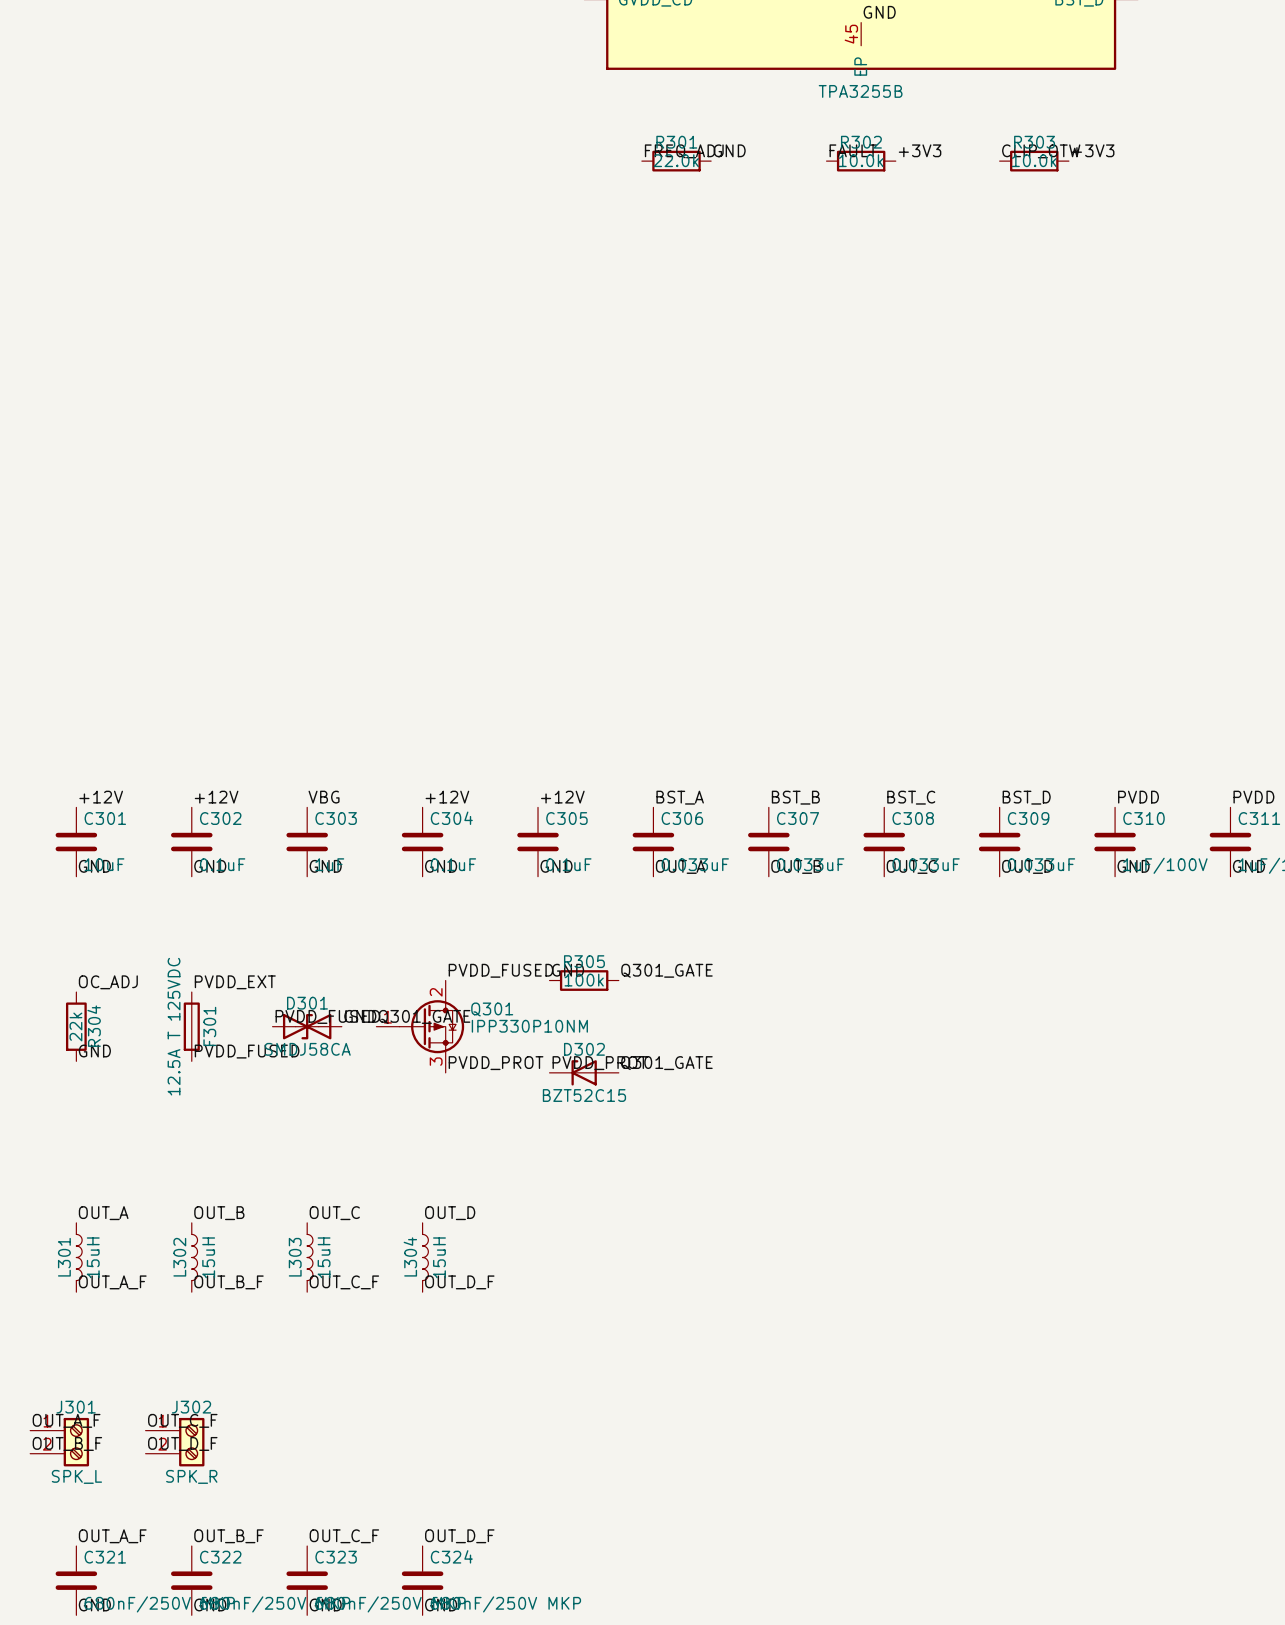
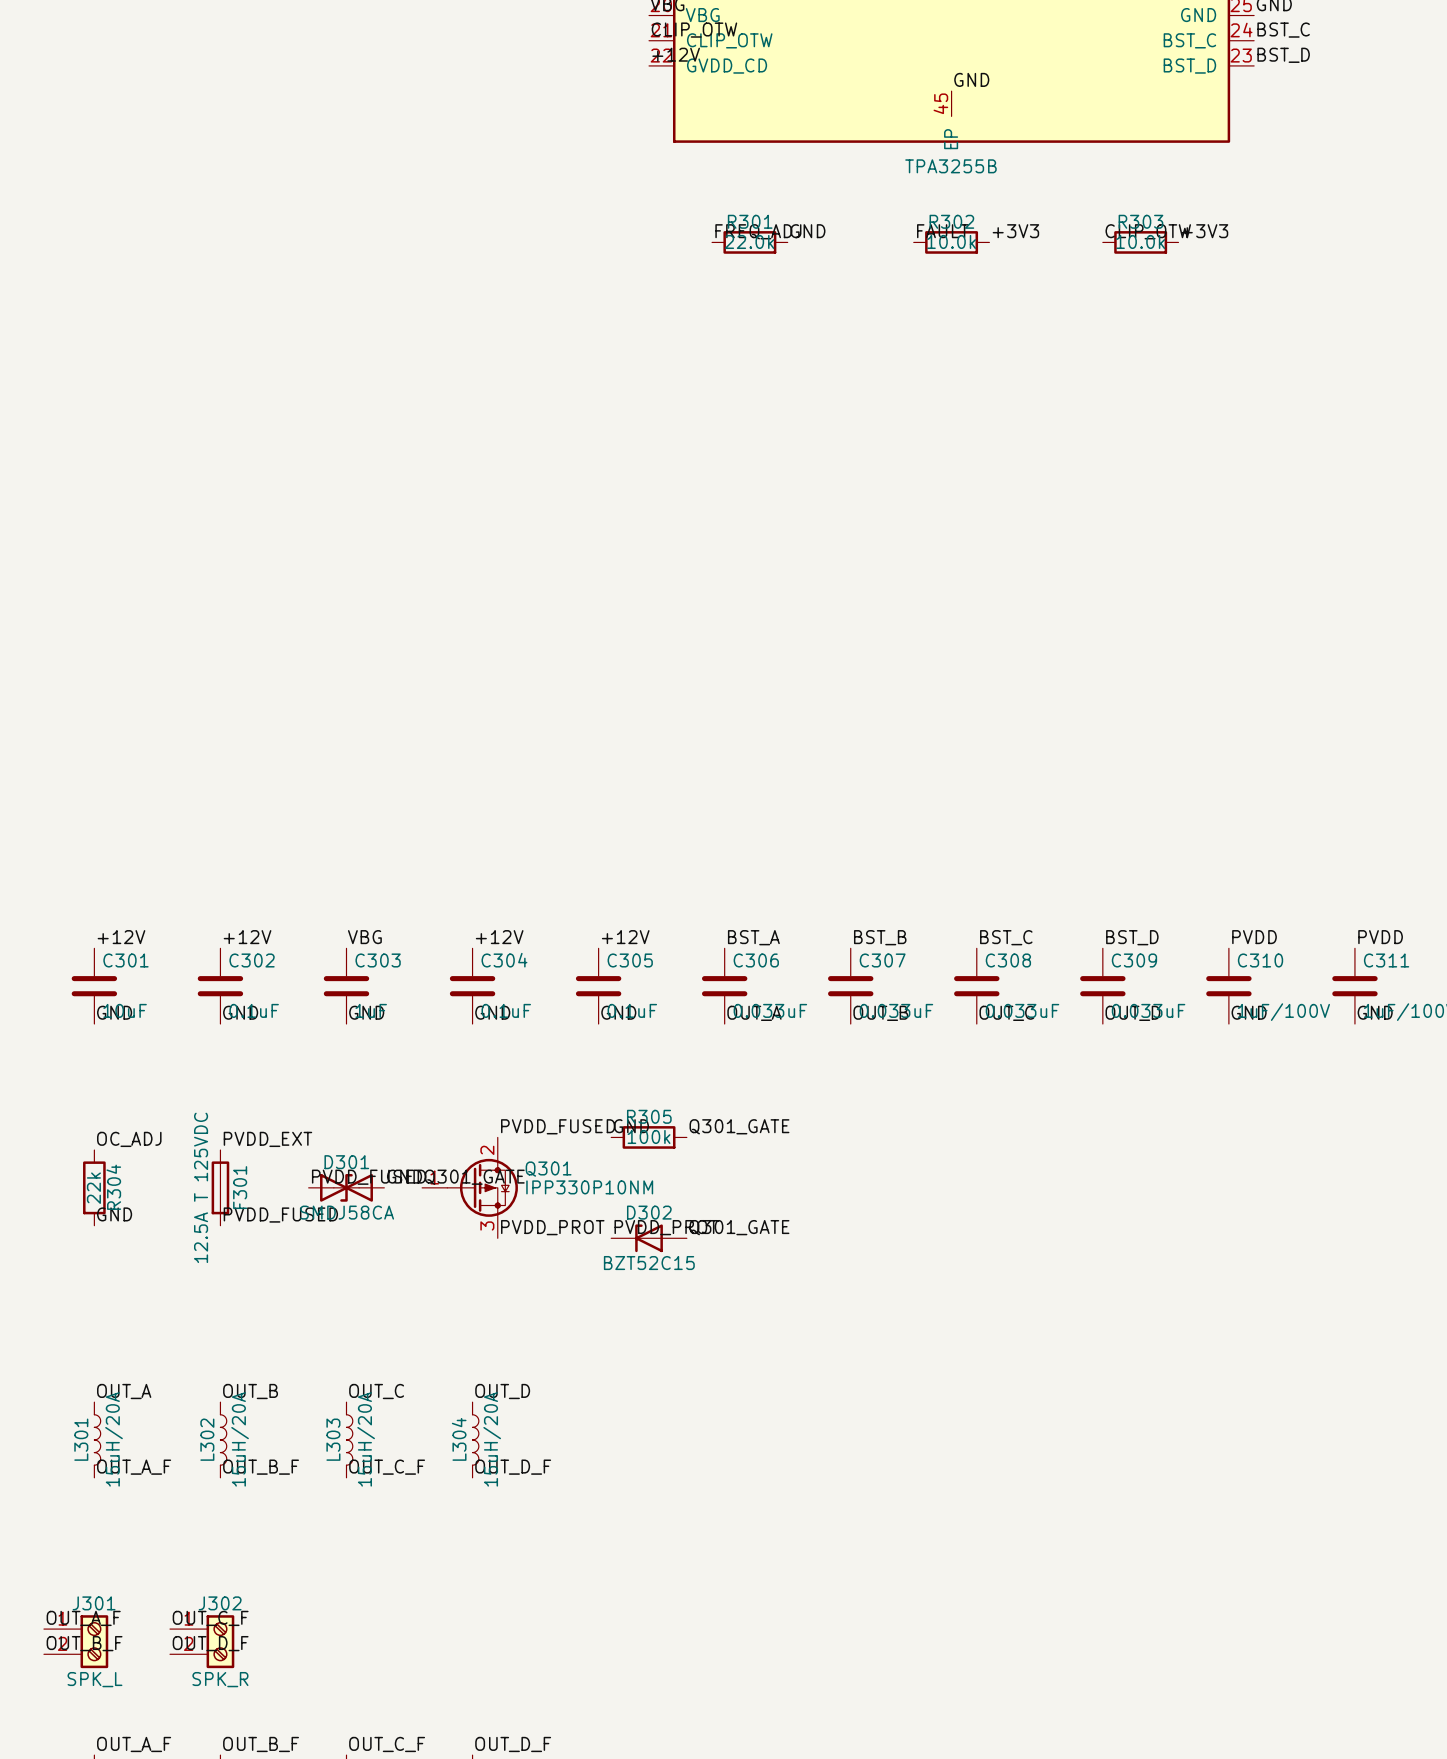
L301 value: 15uH (93, 1257) -> 15uH/20A (114, 1439)
L302 value: 15uH (208, 1257) -> 15uH/20A (240, 1439)
L303 value: 15uH (324, 1257) -> 15uH/20A (366, 1439)
L304 value: 15uH (439, 1257) -> 15uH/20A (492, 1439)

